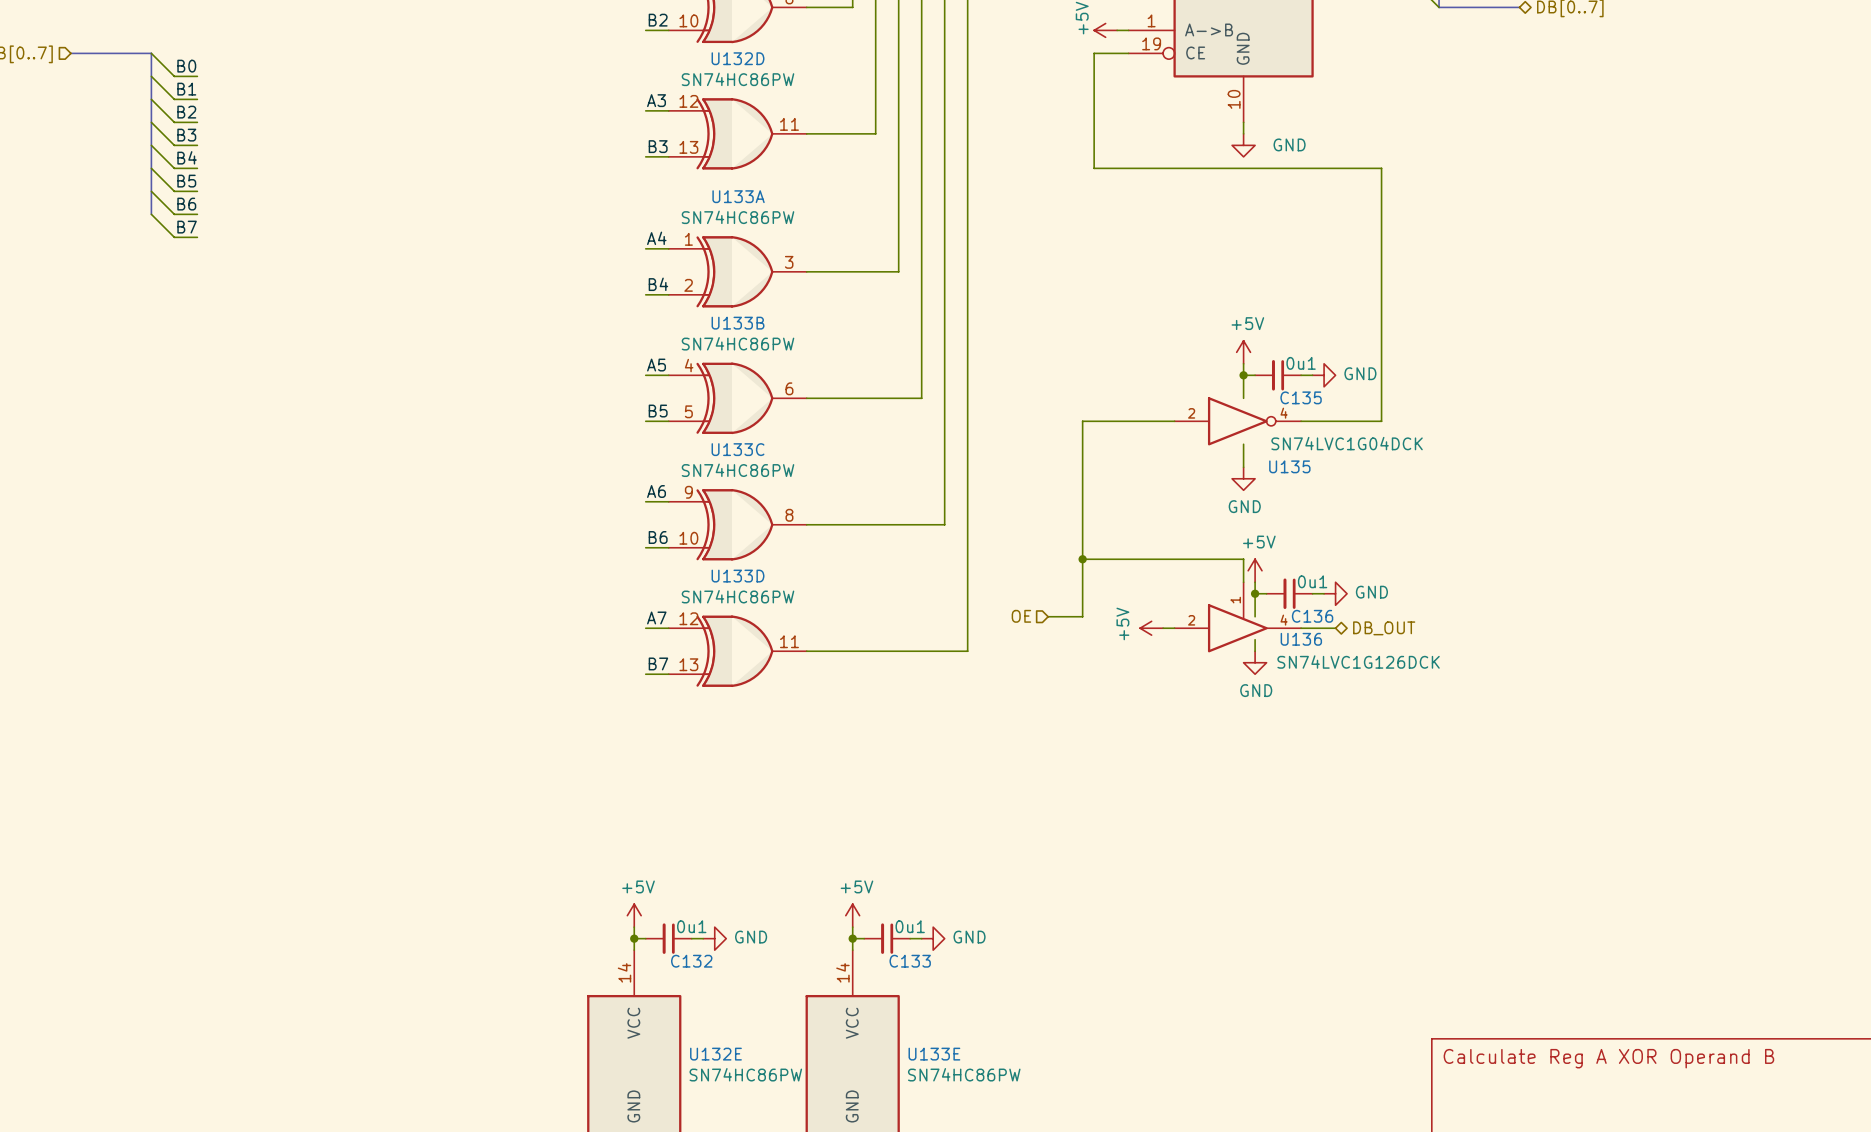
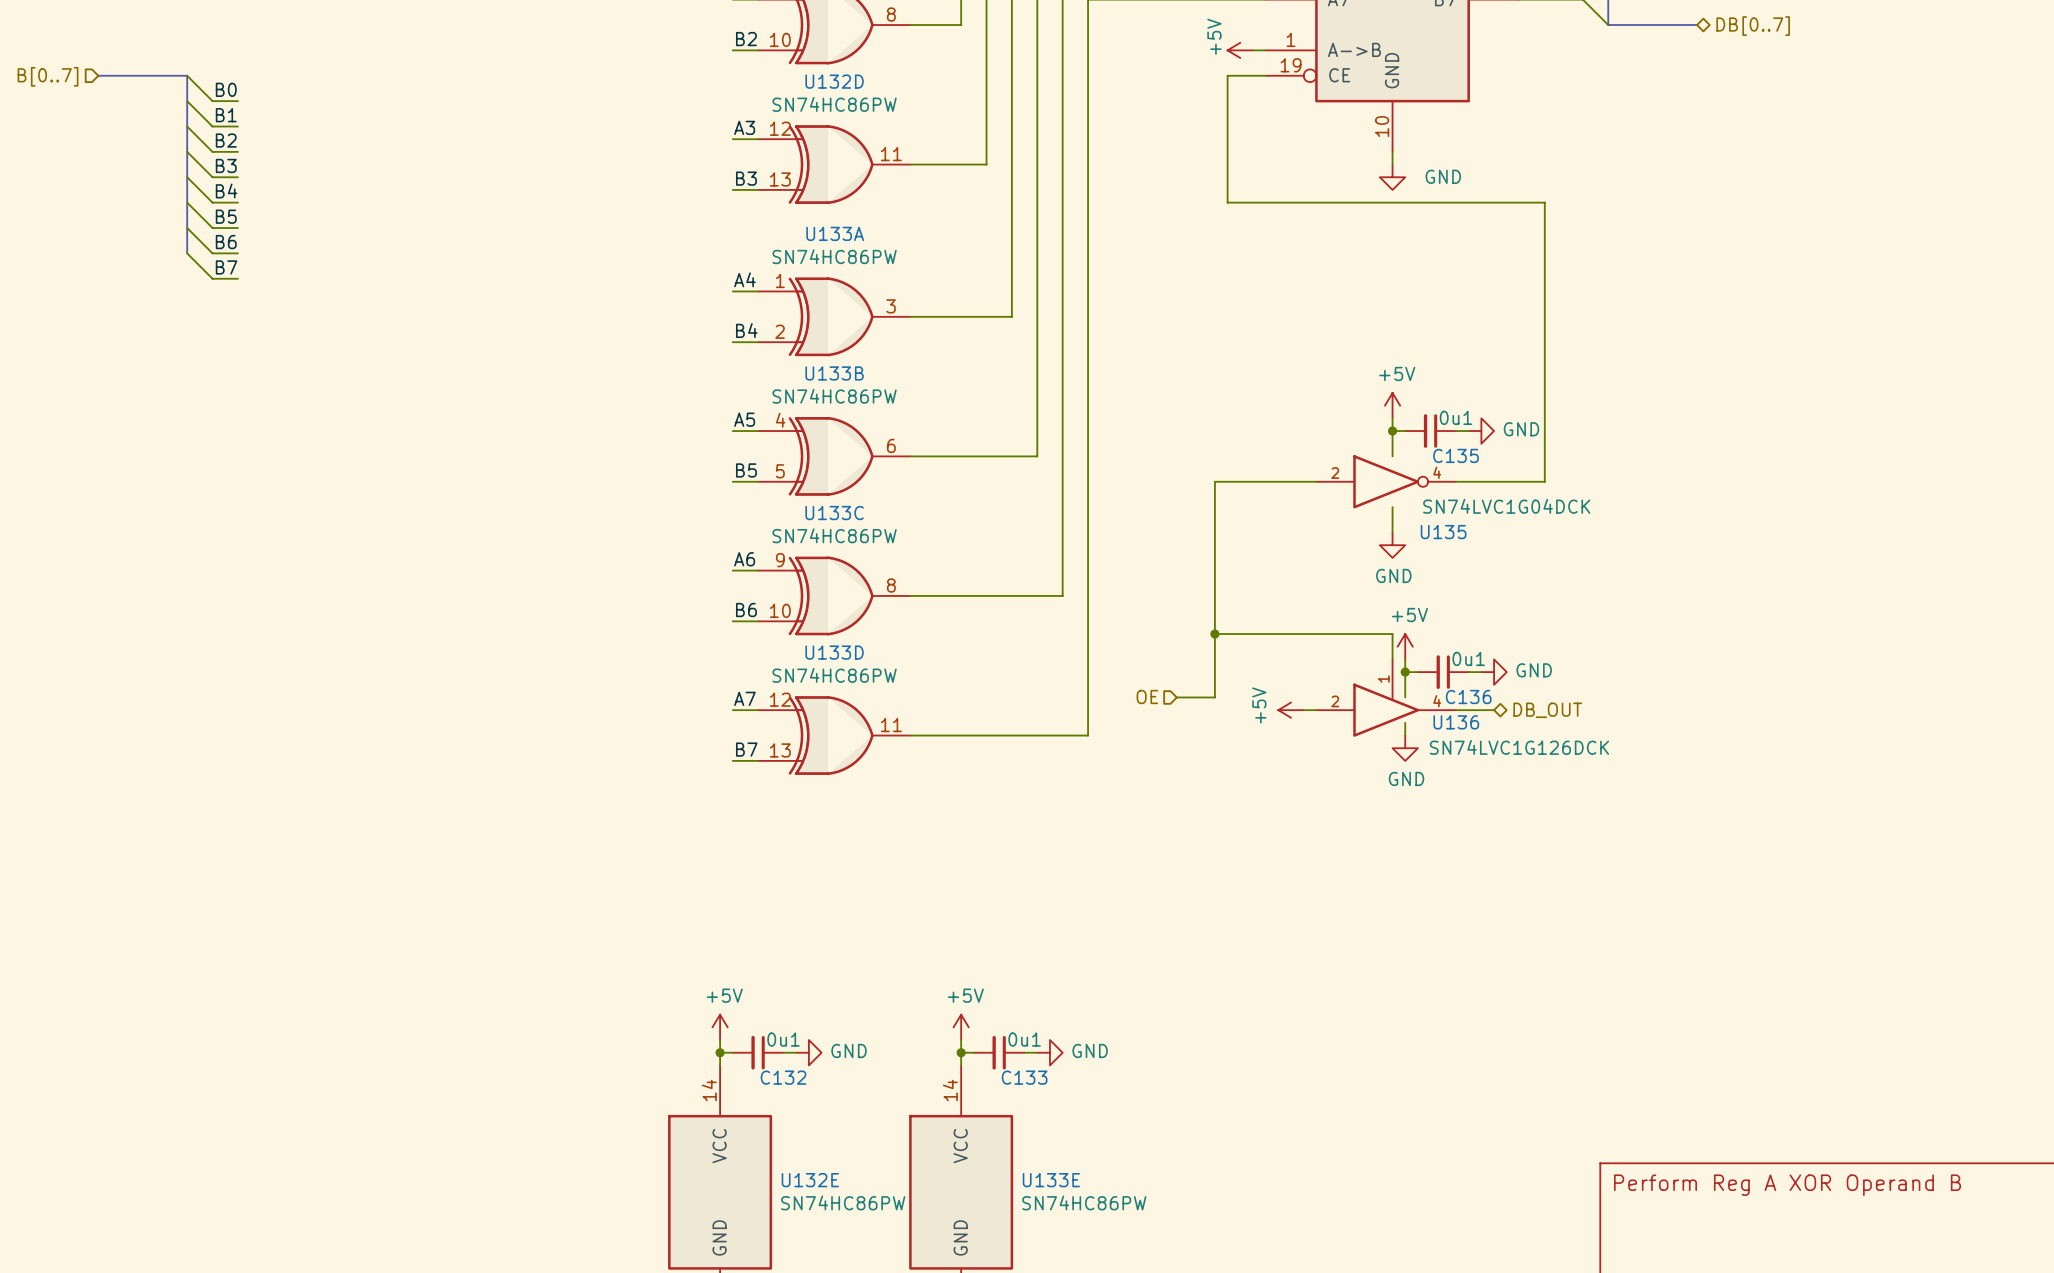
title block: Calculate Reg A XOR Operand B (1608, 1058) -> Perform Reg A XOR Operand B (1787, 1185)

